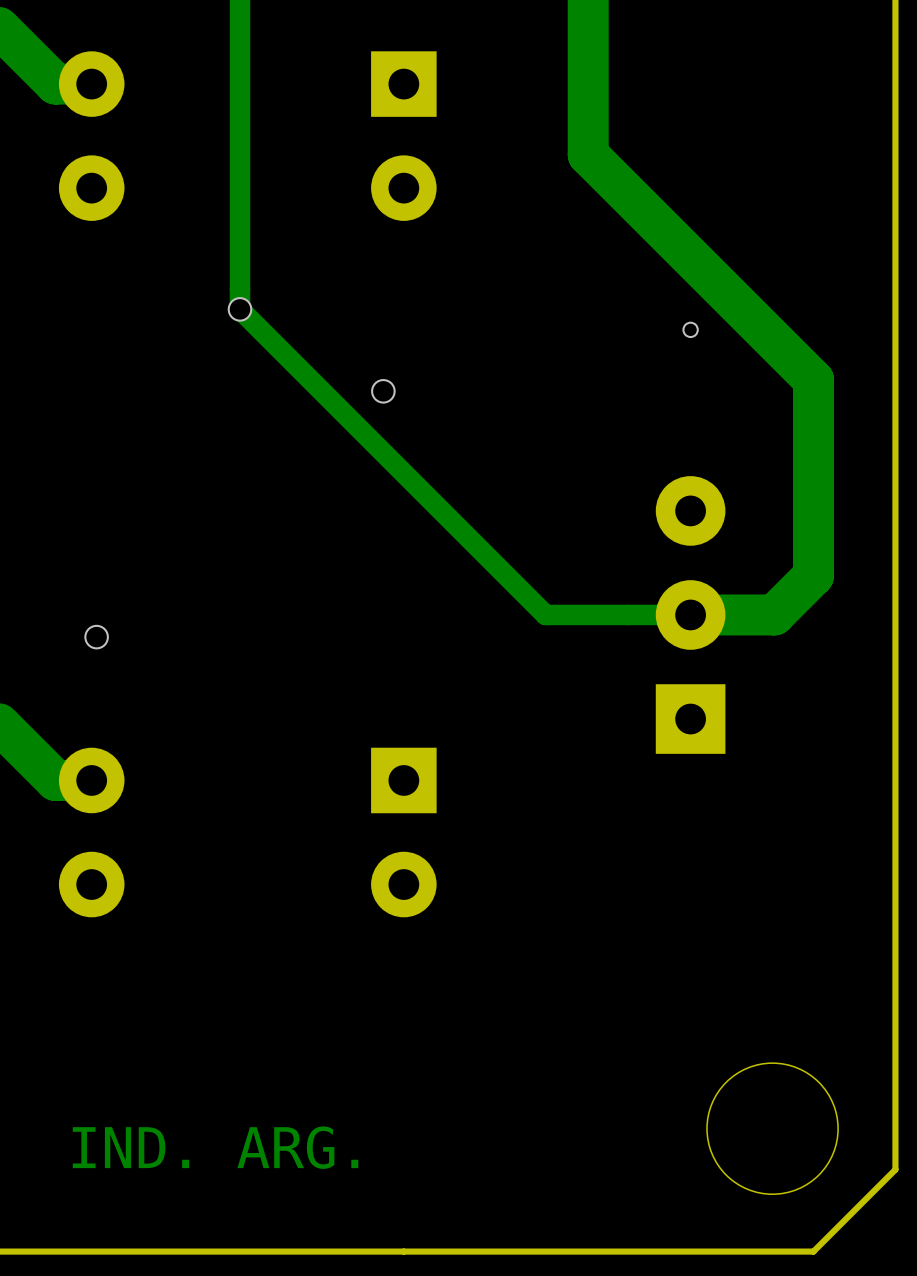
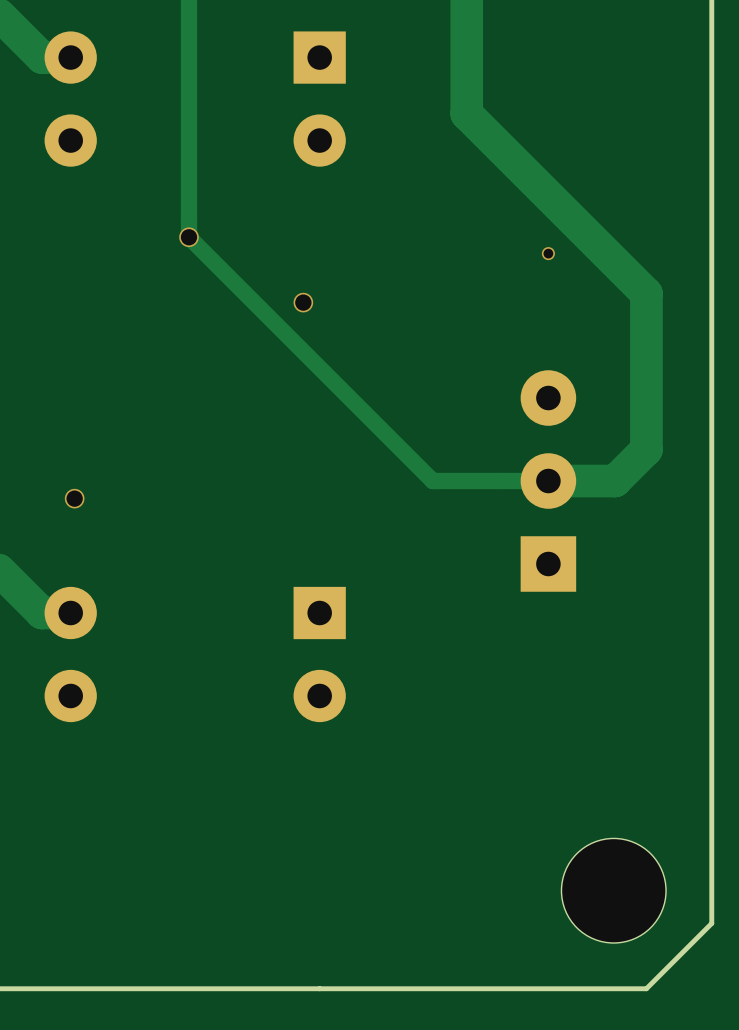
text: IND. ARG. (215, 1147) -> none

